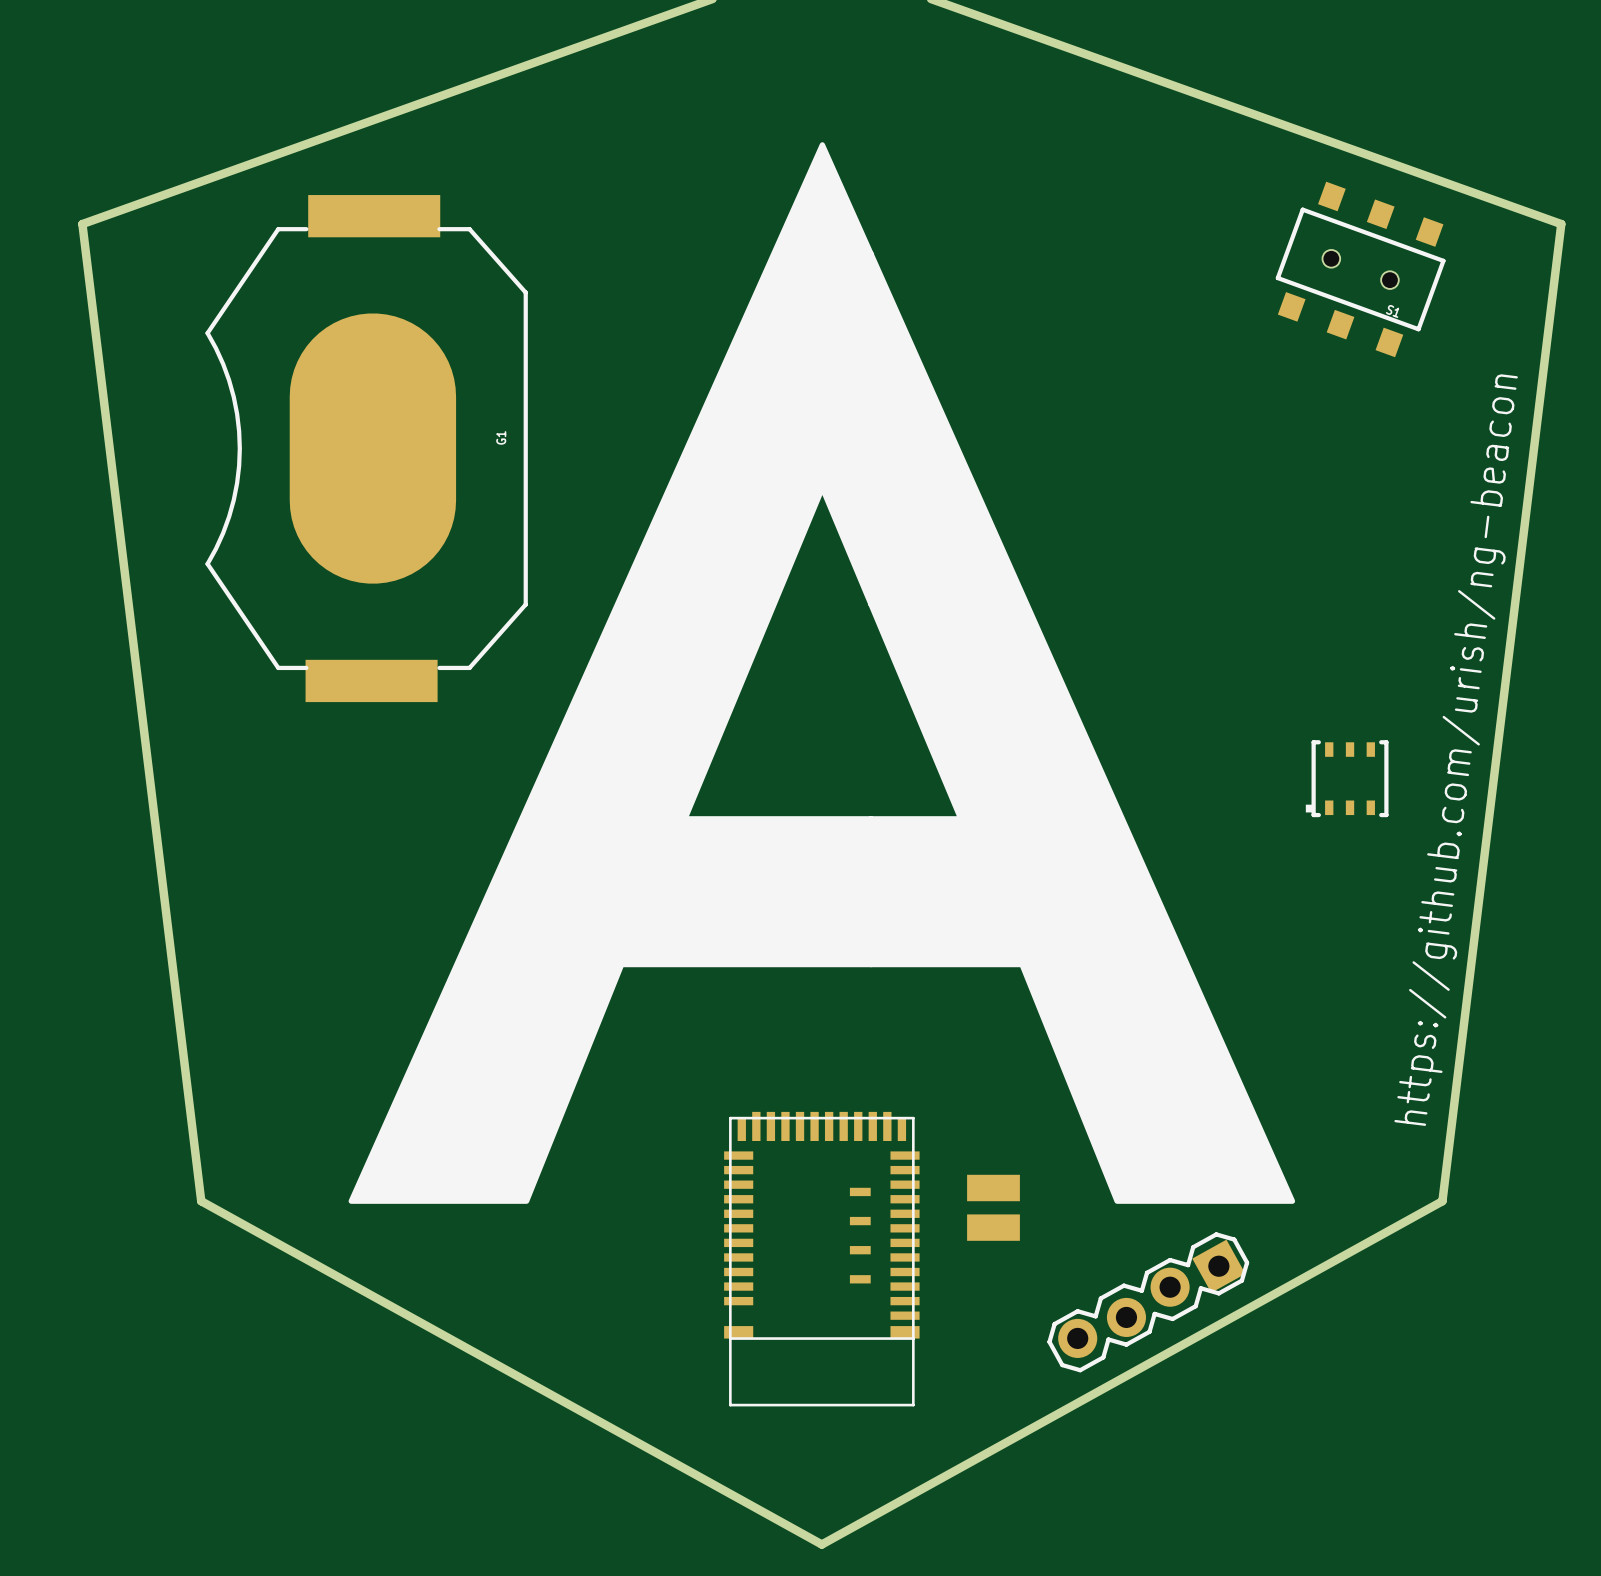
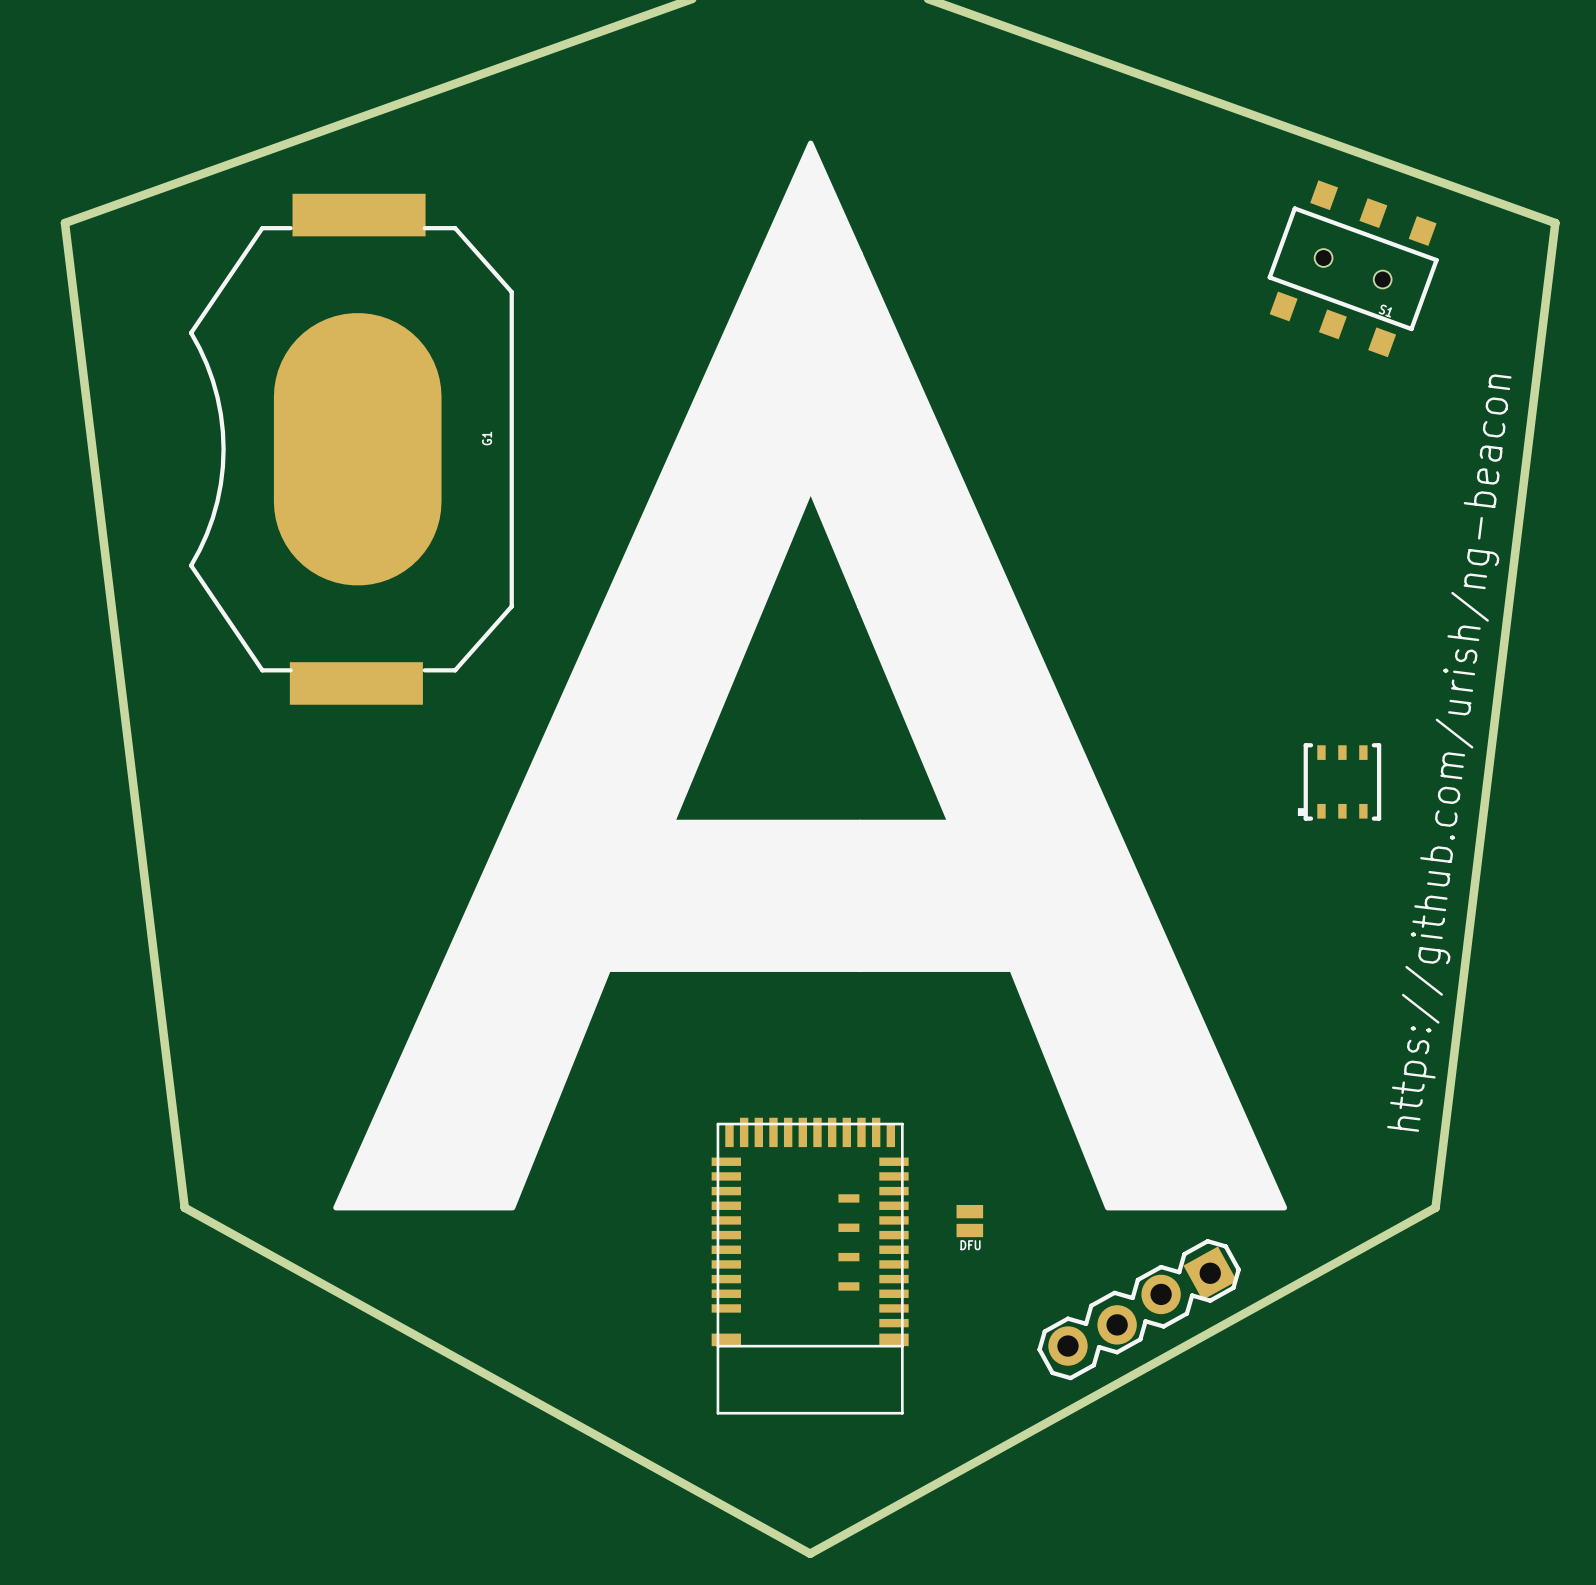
part: (993, 1188) -> none
DFU: none -> (969, 1221)
part: (993, 1227) -> none

